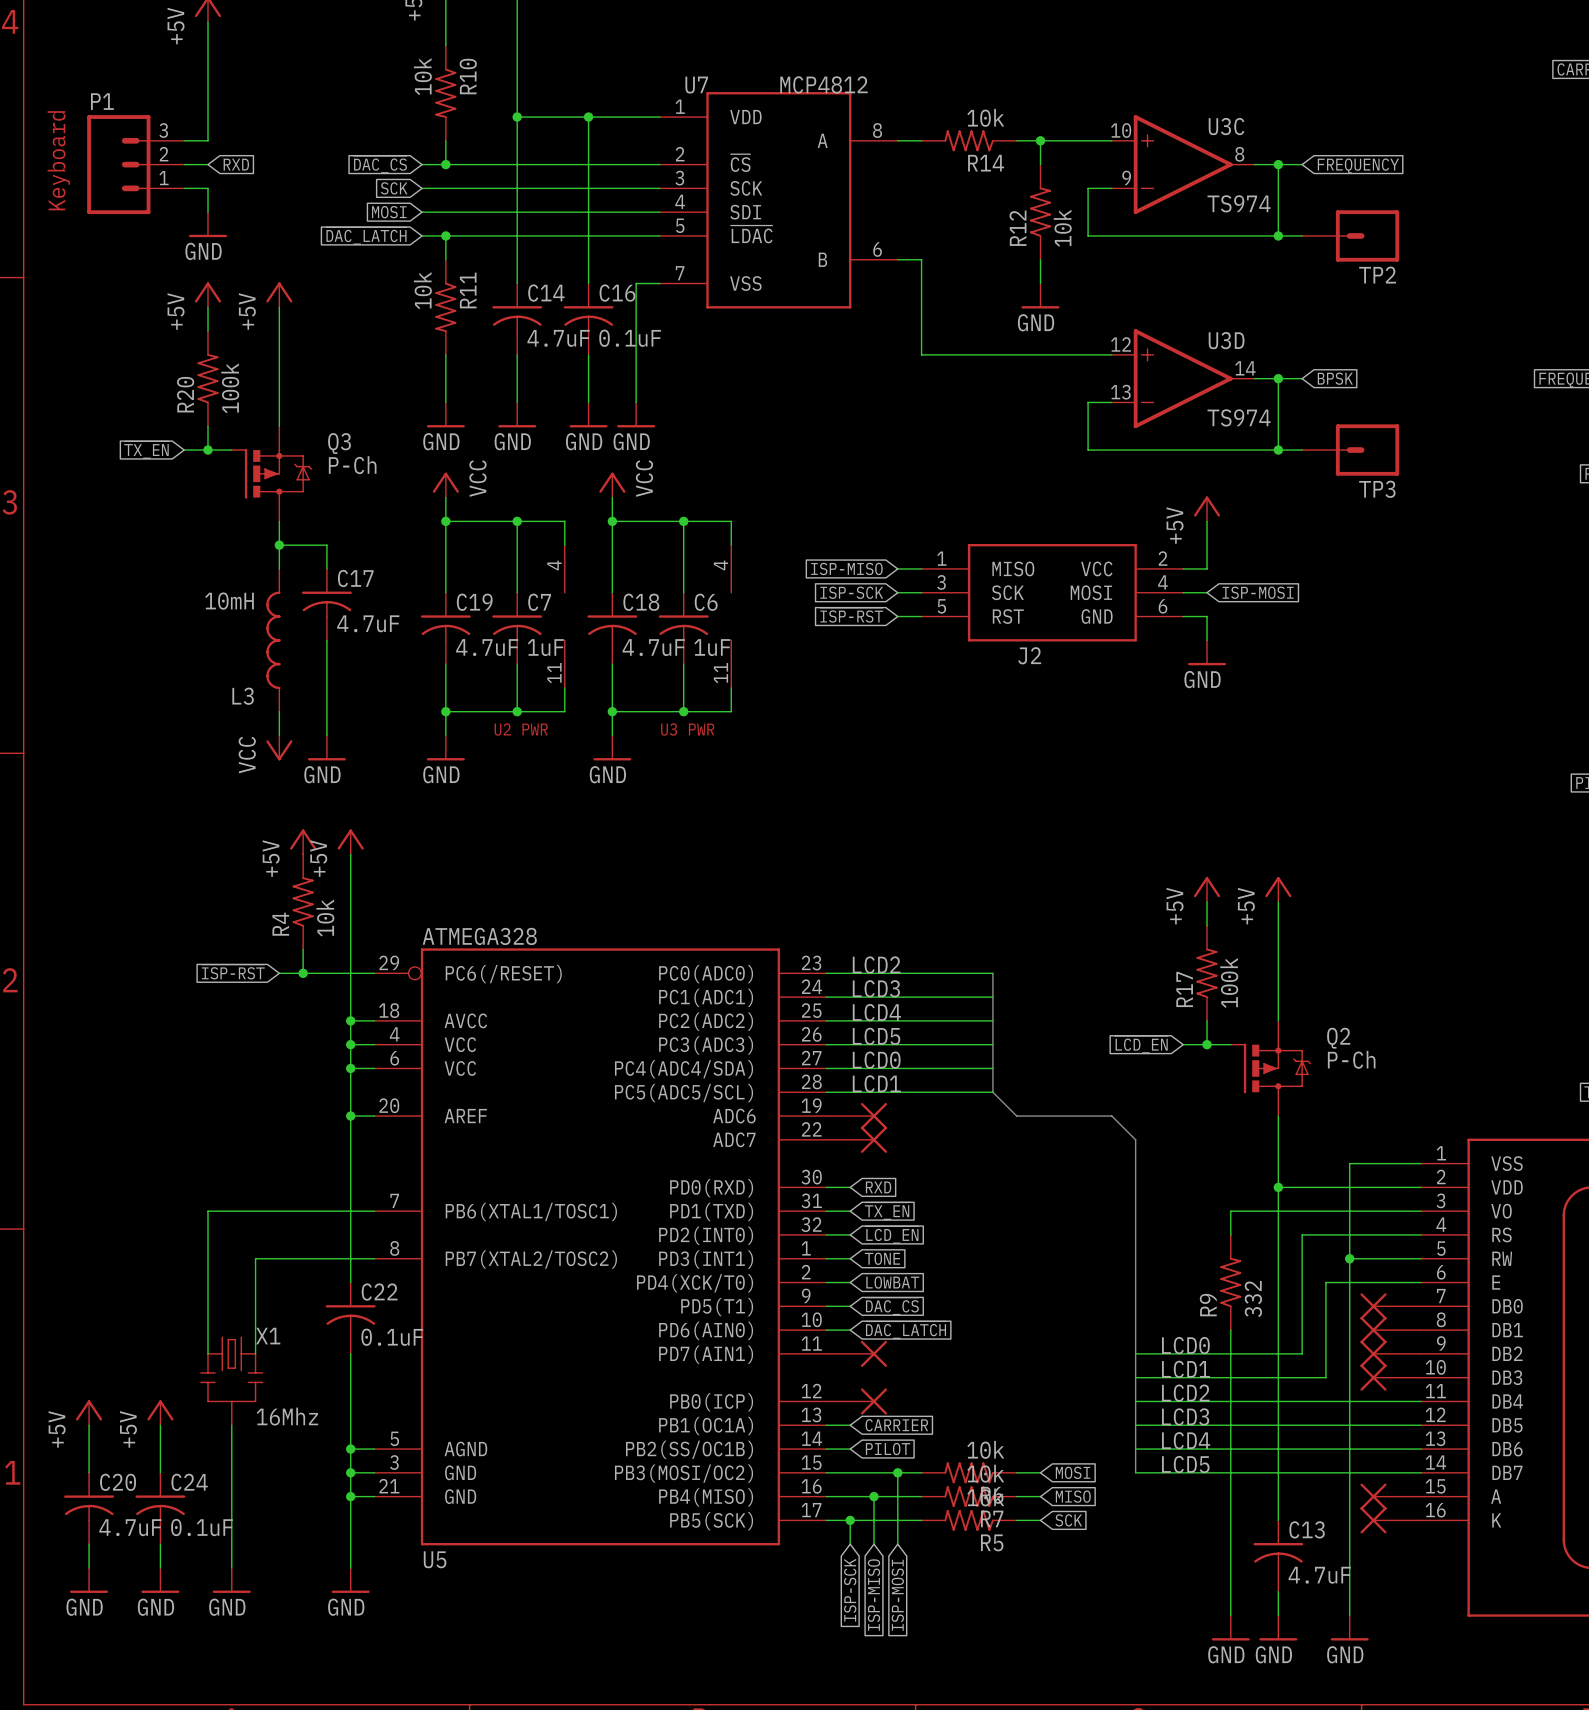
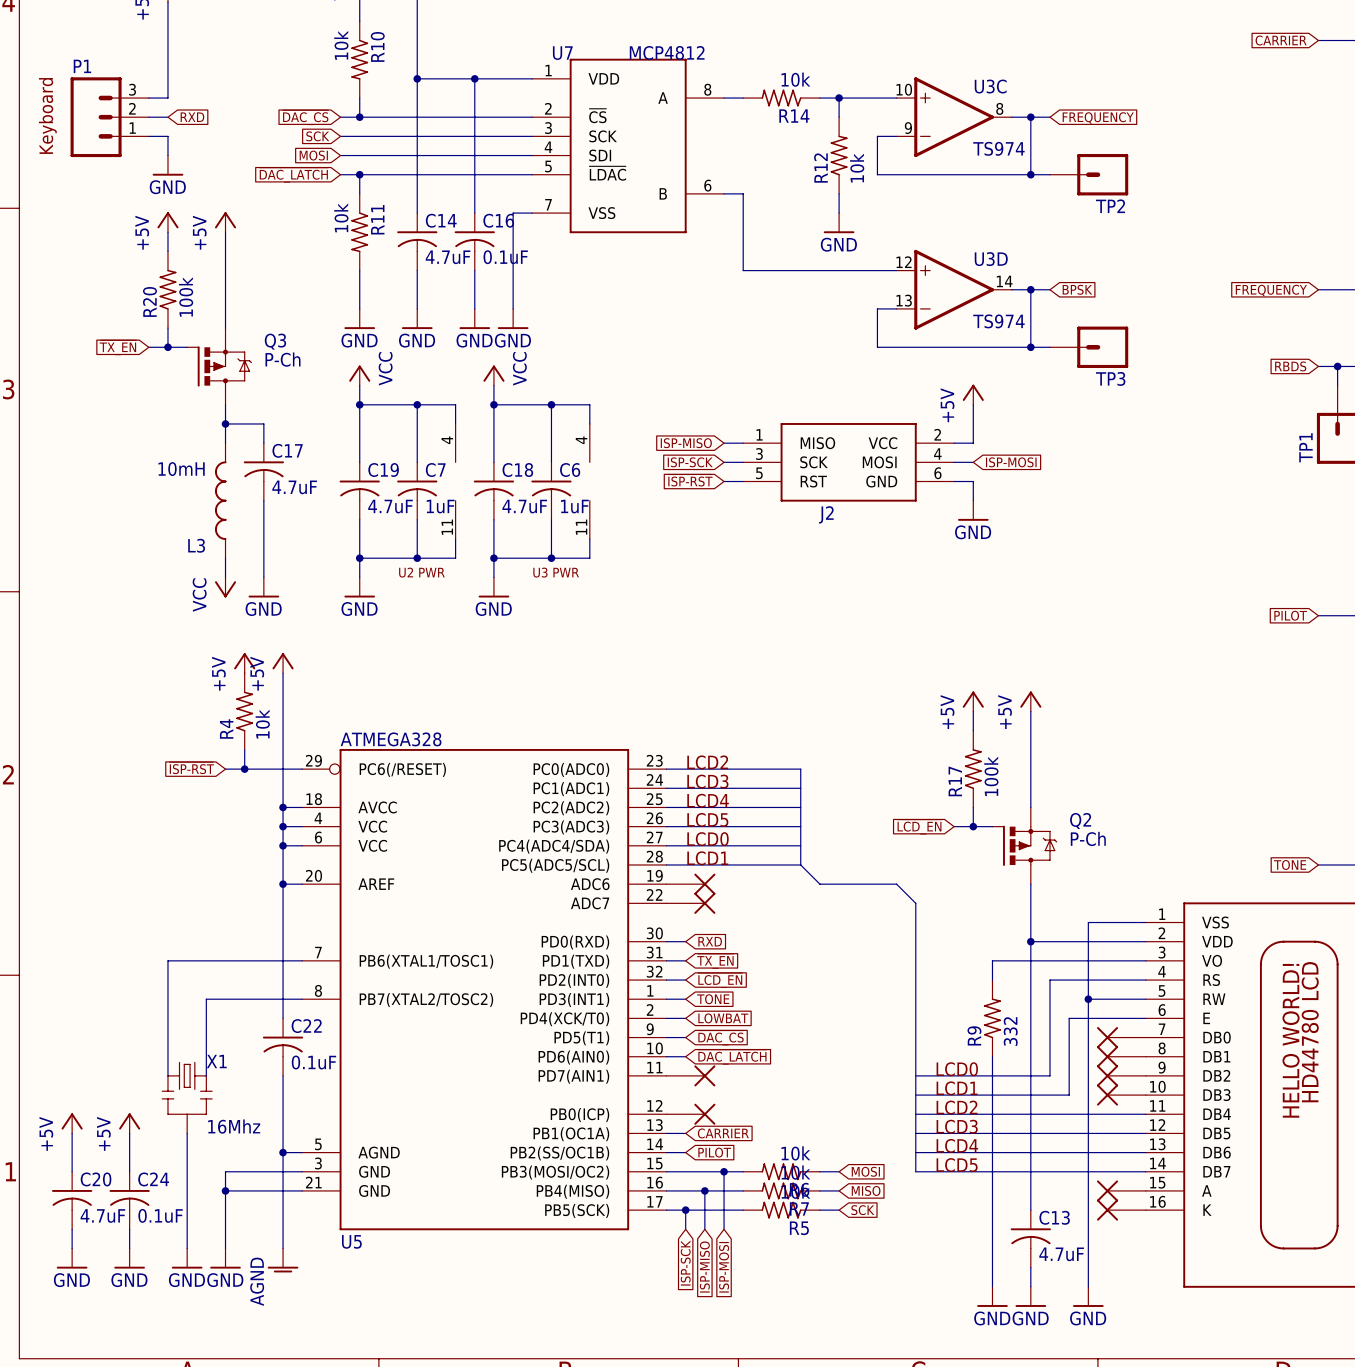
wire: none -> (283, 1171) (225, 1171) (225, 1248)
junction: (350, 1472) -> none
wire: none -> (225, 1190) (283, 1190)
junction: none -> (225, 1190)
junction: (350, 1496) -> none
power symbol: none -> GND (225, 1258)
power symbol: GND (350, 1580) -> AGND (283, 1260)

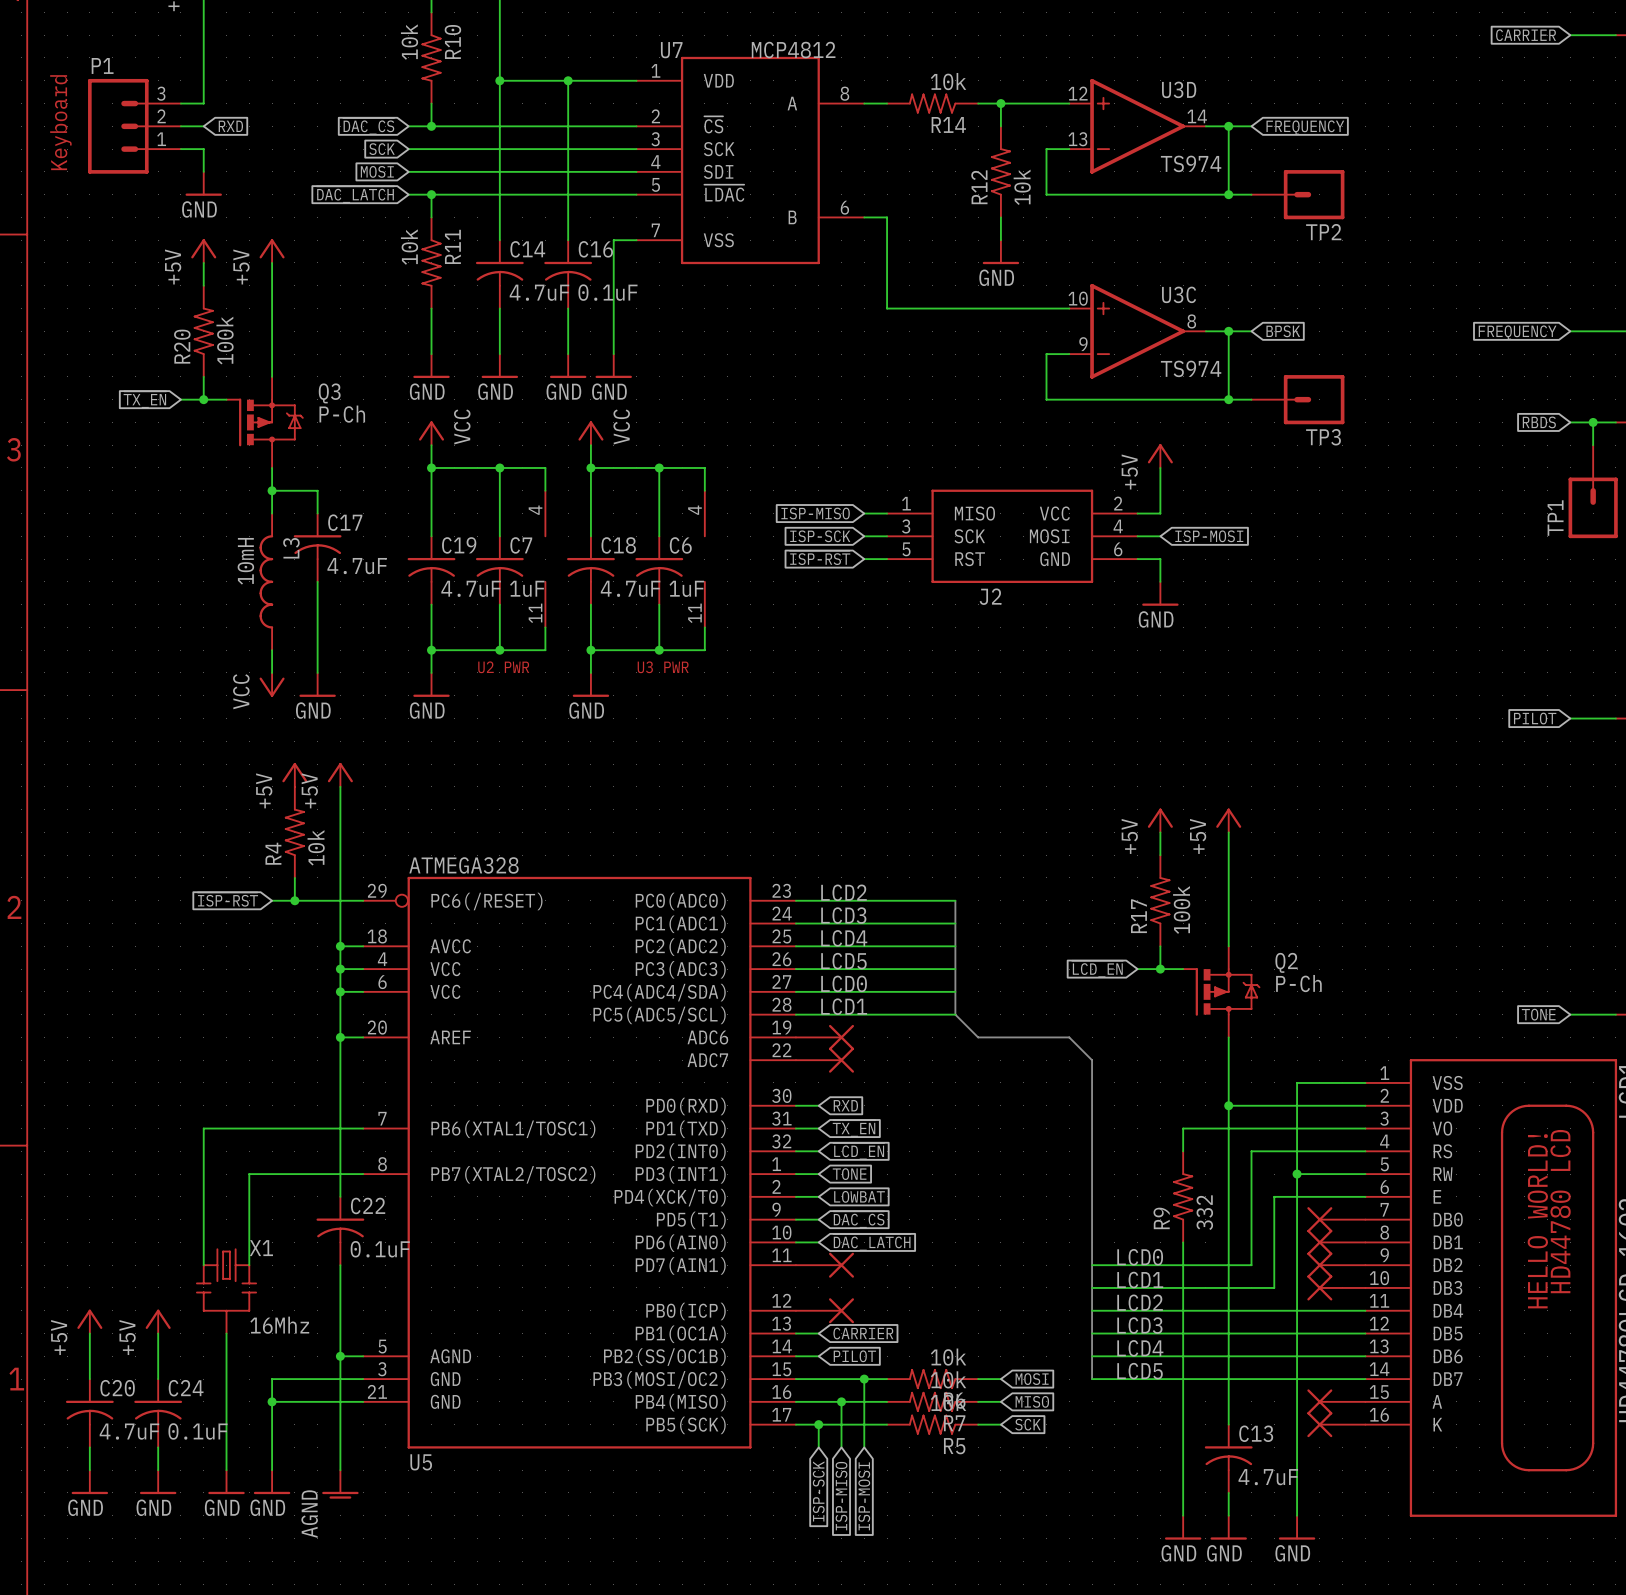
U3C position: (954, 117) -> (1137, 331)
U3D position: (954, 289) -> (1137, 126)
L3 value rotation: 0° (181, 469) -> 90° counterclockwise (245, 561)
L3 name rotation: 0° (196, 545) -> 90° counterclockwise (291, 548)
L3 name position: L3 (196, 545) -> L3 (291, 548)

